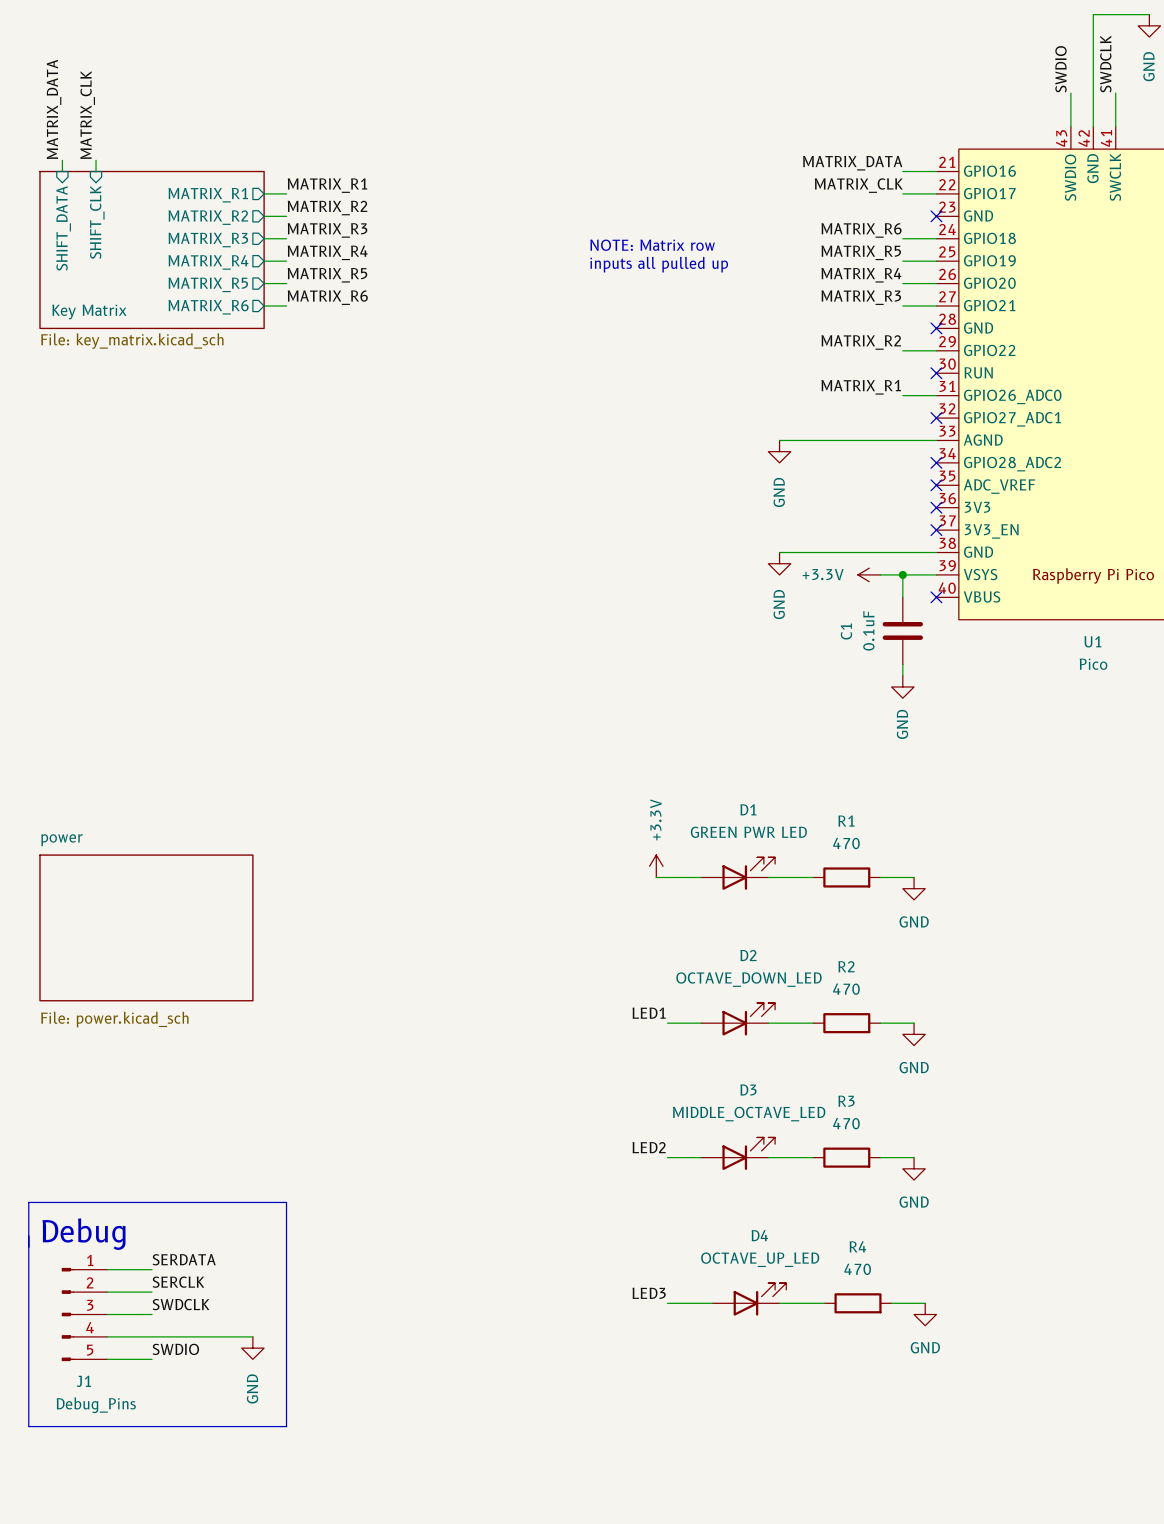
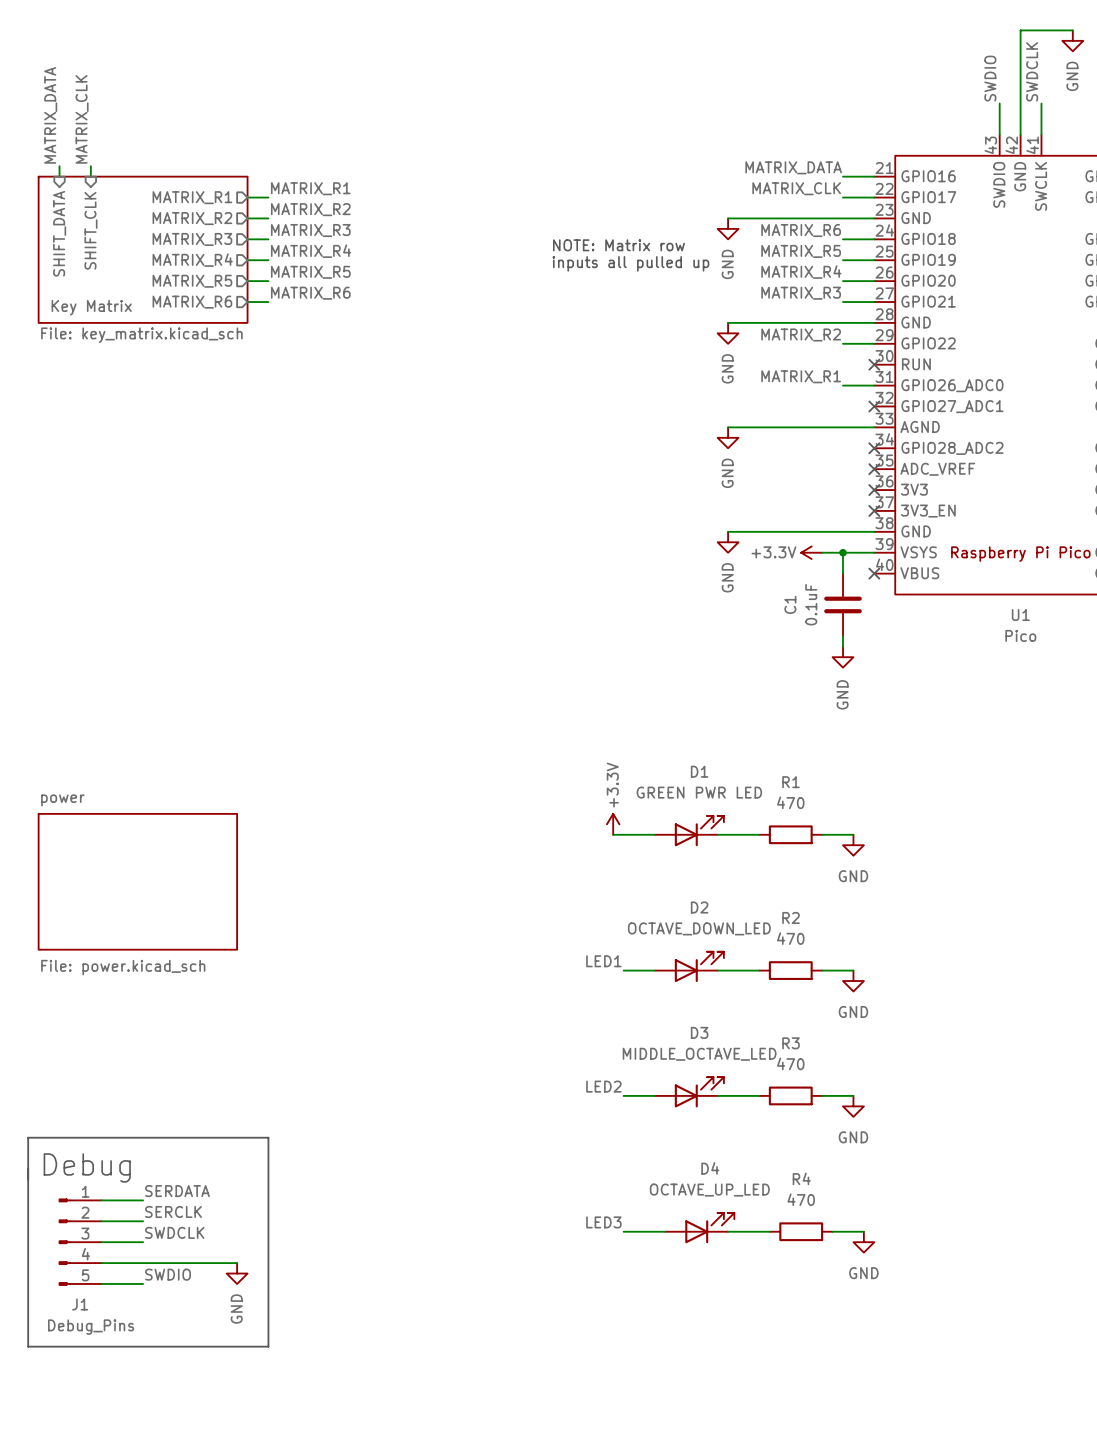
wire: none -> (728, 218) (874, 218)
no-connect mark: (936, 216) -> none
power symbol: none -> GND (728, 228)
wire: none -> (728, 322) (874, 322)
no-connect mark: (936, 328) -> none
power symbol: none -> GND (728, 333)

